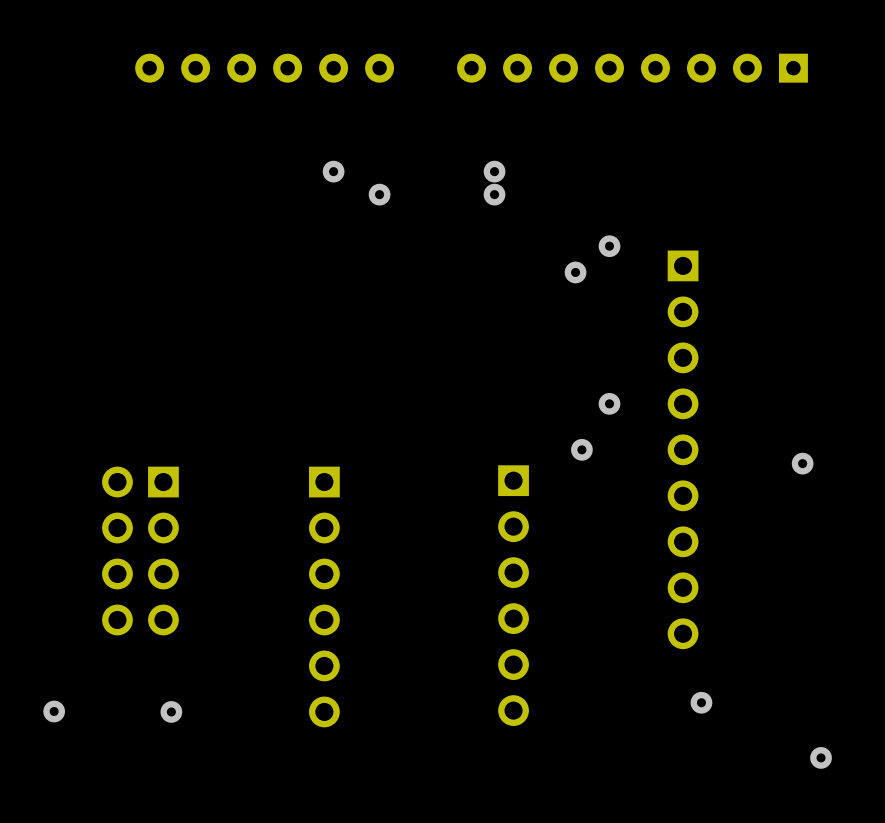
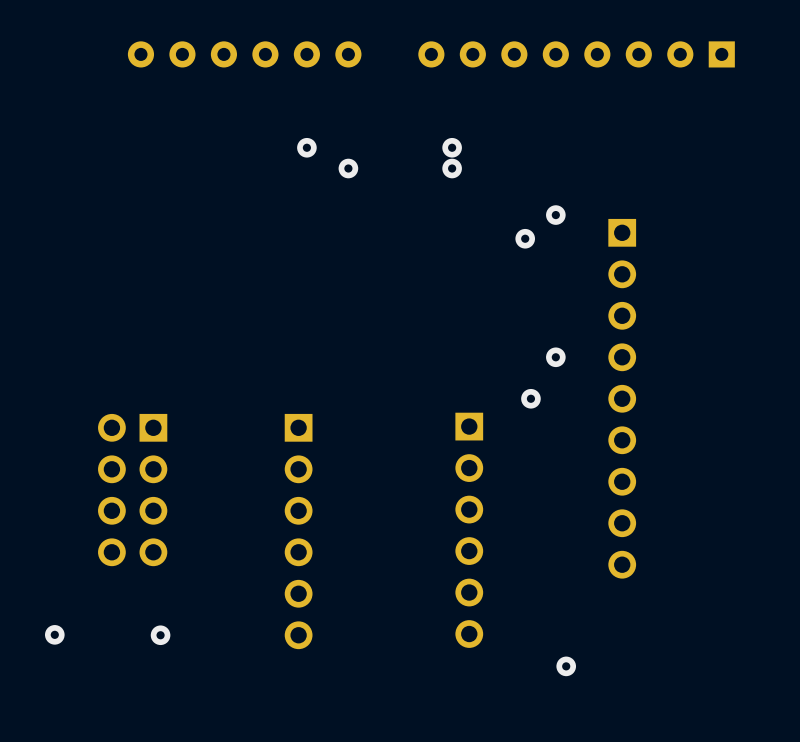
via: (802, 463) -> none
via position: (701, 702) -> (566, 666)
via: (821, 757) -> none

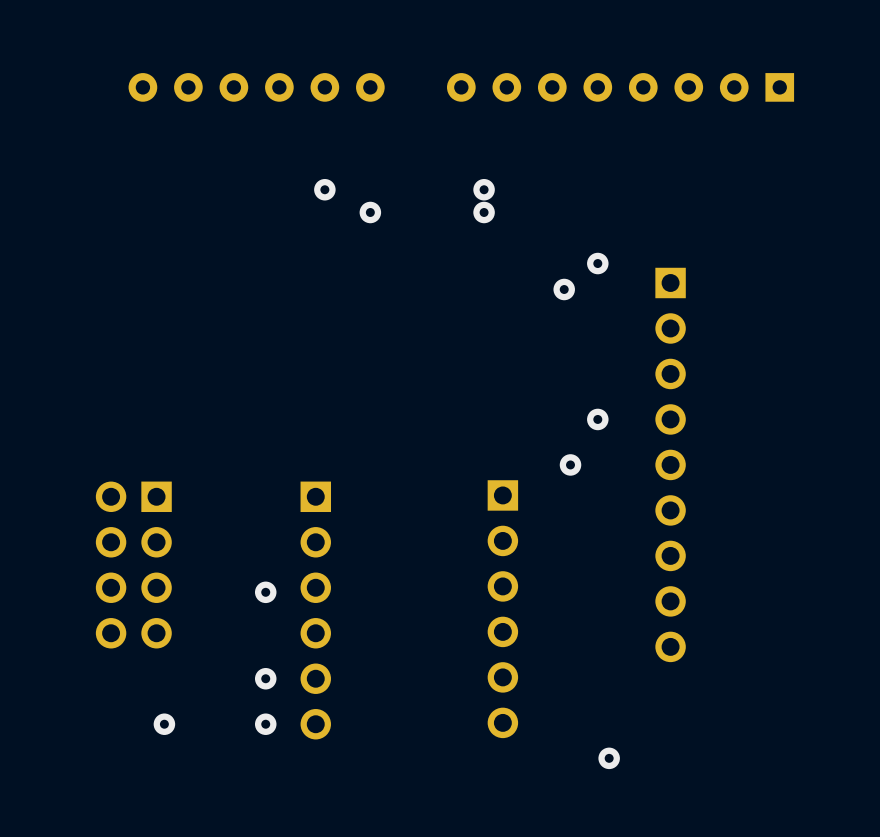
via: none -> (265, 592)
via: none -> (265, 678)
via: (54, 634) -> none
via: none -> (265, 724)

